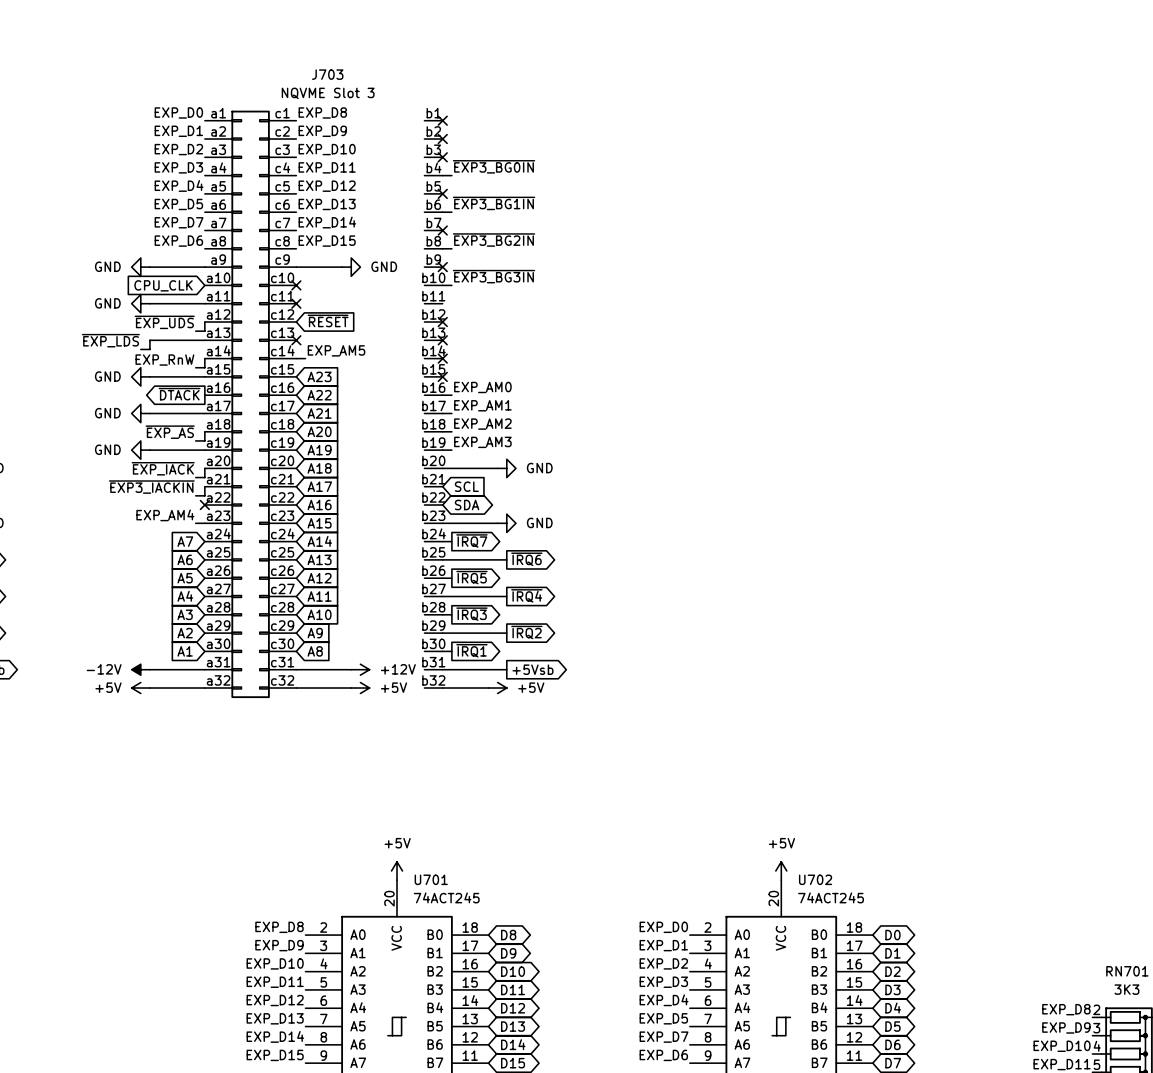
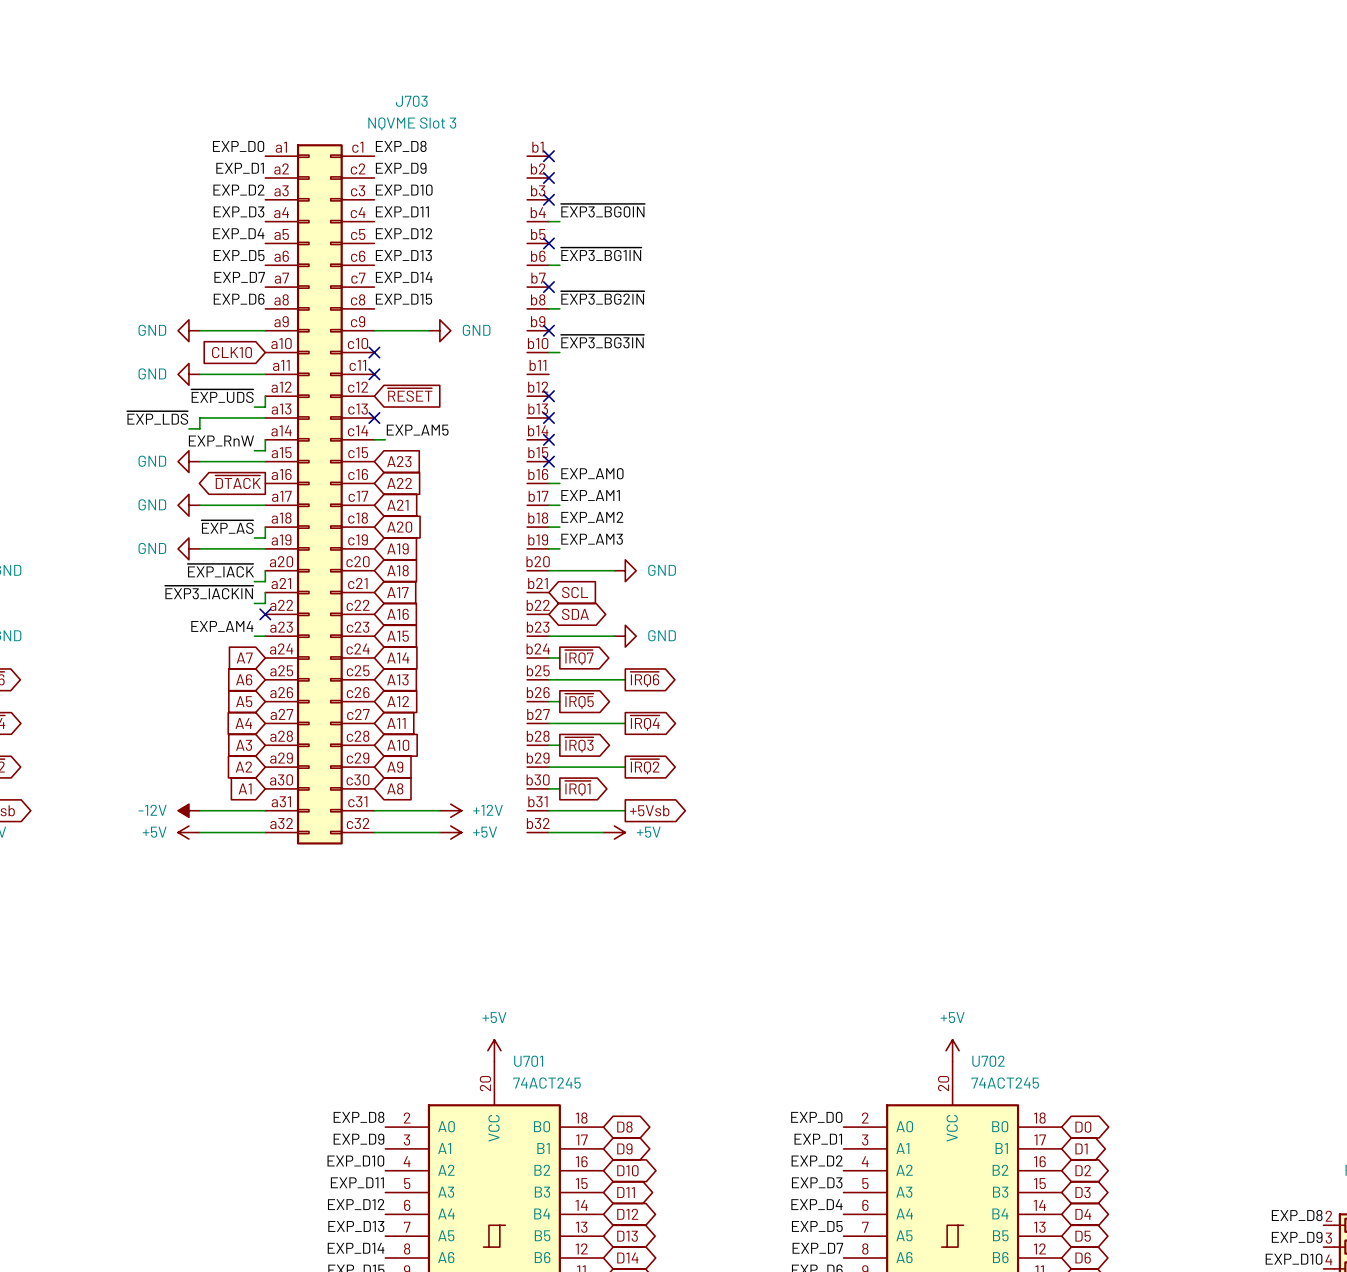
global label: CPU_CLK (163, 285) -> CLK10 (232, 352)

